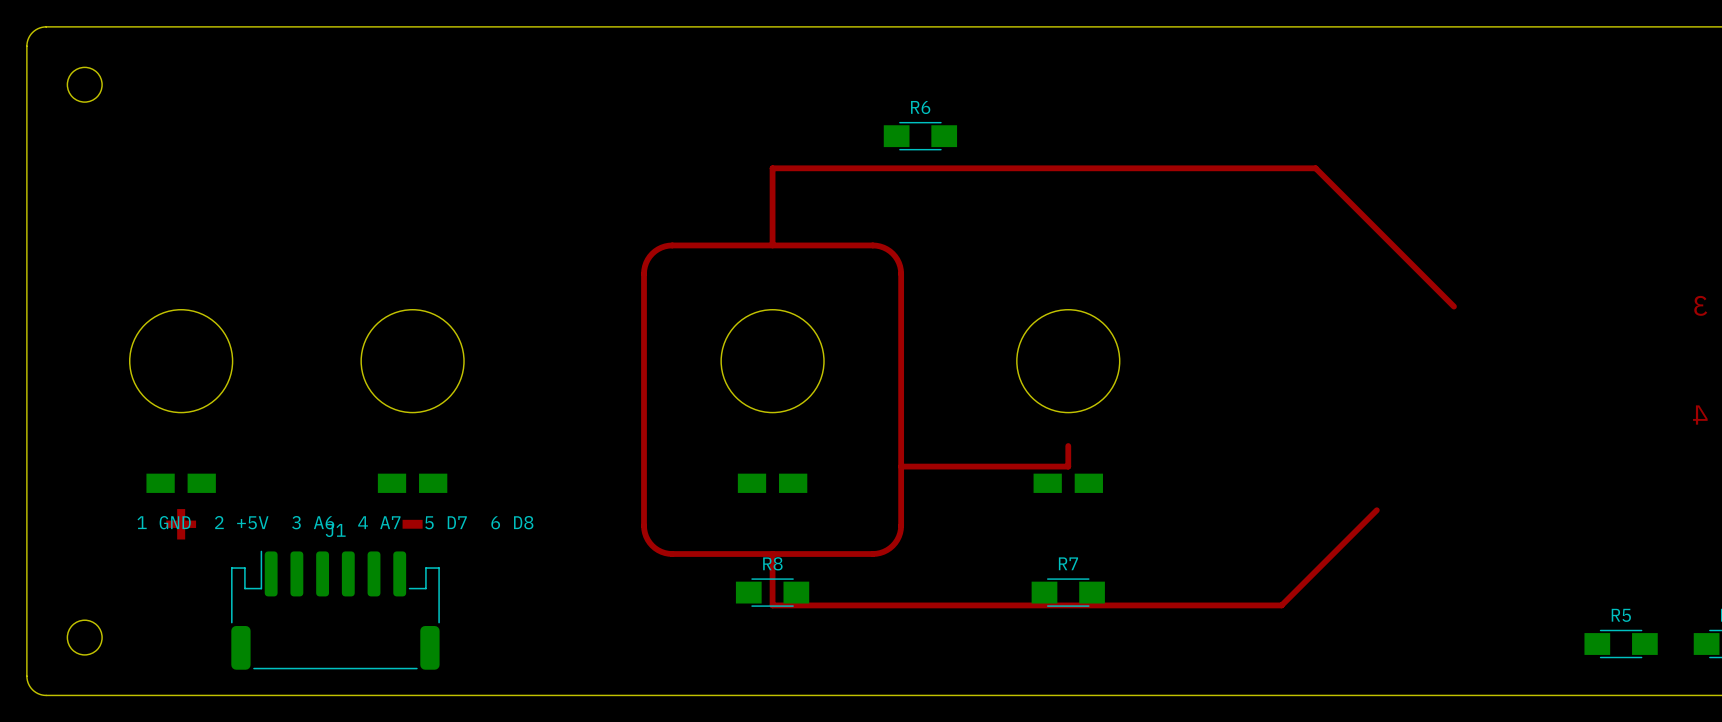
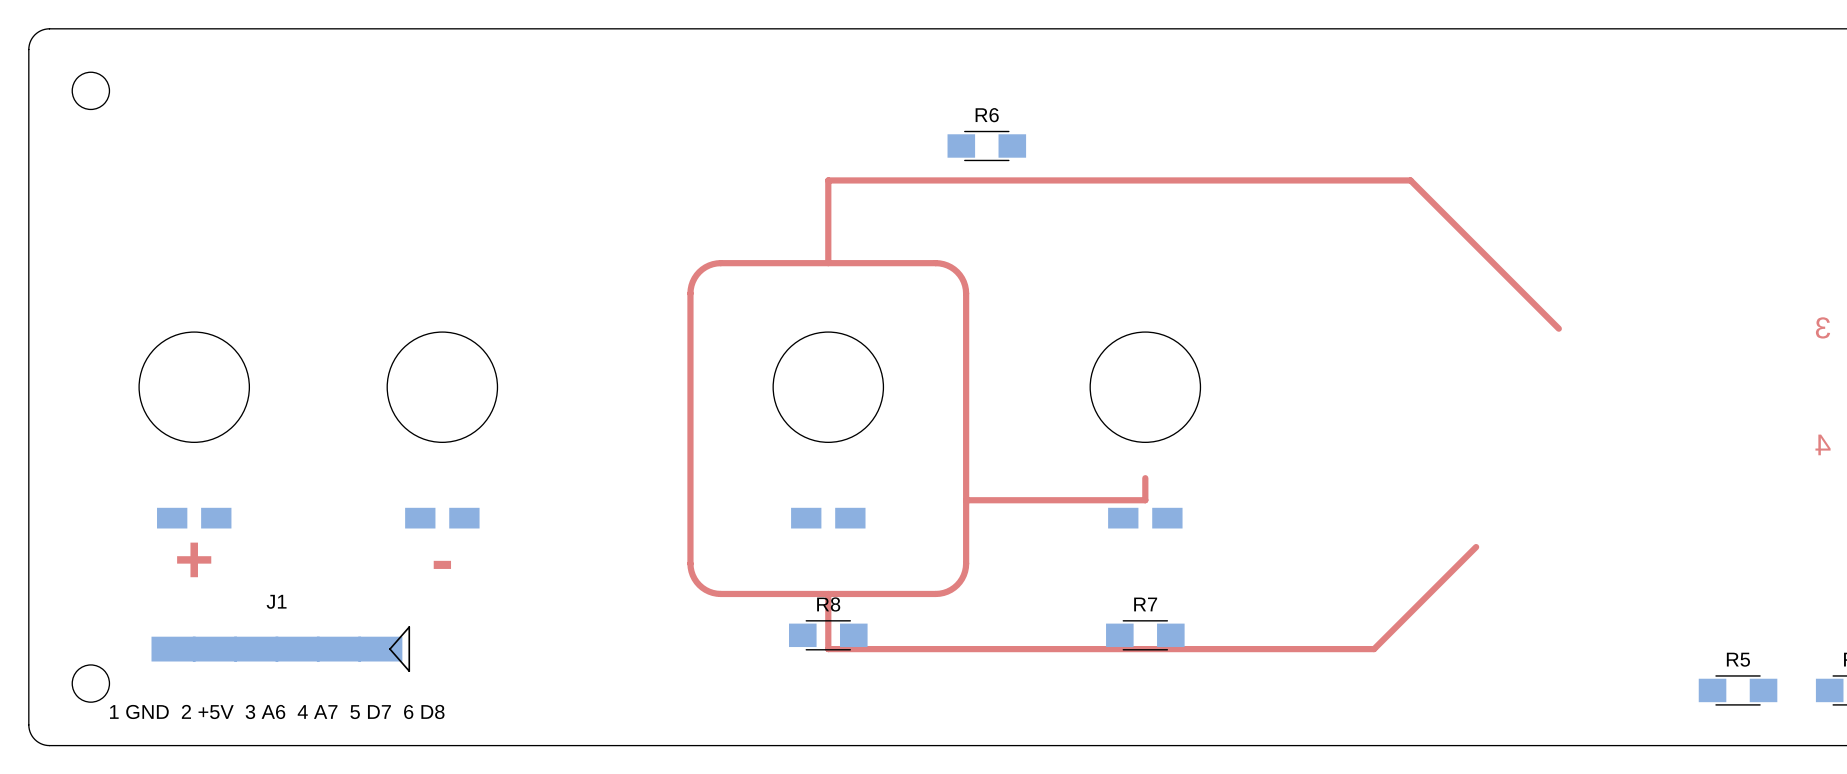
text position: 1 GND 2 +5V 3 A6 4 A7 5 D7 6 D8 (335, 522) -> 1 GND 2 +5V 3 A6 4 A7 5 D7 6 D8 (277, 711)
J1 name position: J1 (335, 530) -> J1 (276, 601)
J1 footprint: [231, 550, 440, 670] -> [151, 626, 411, 672]

